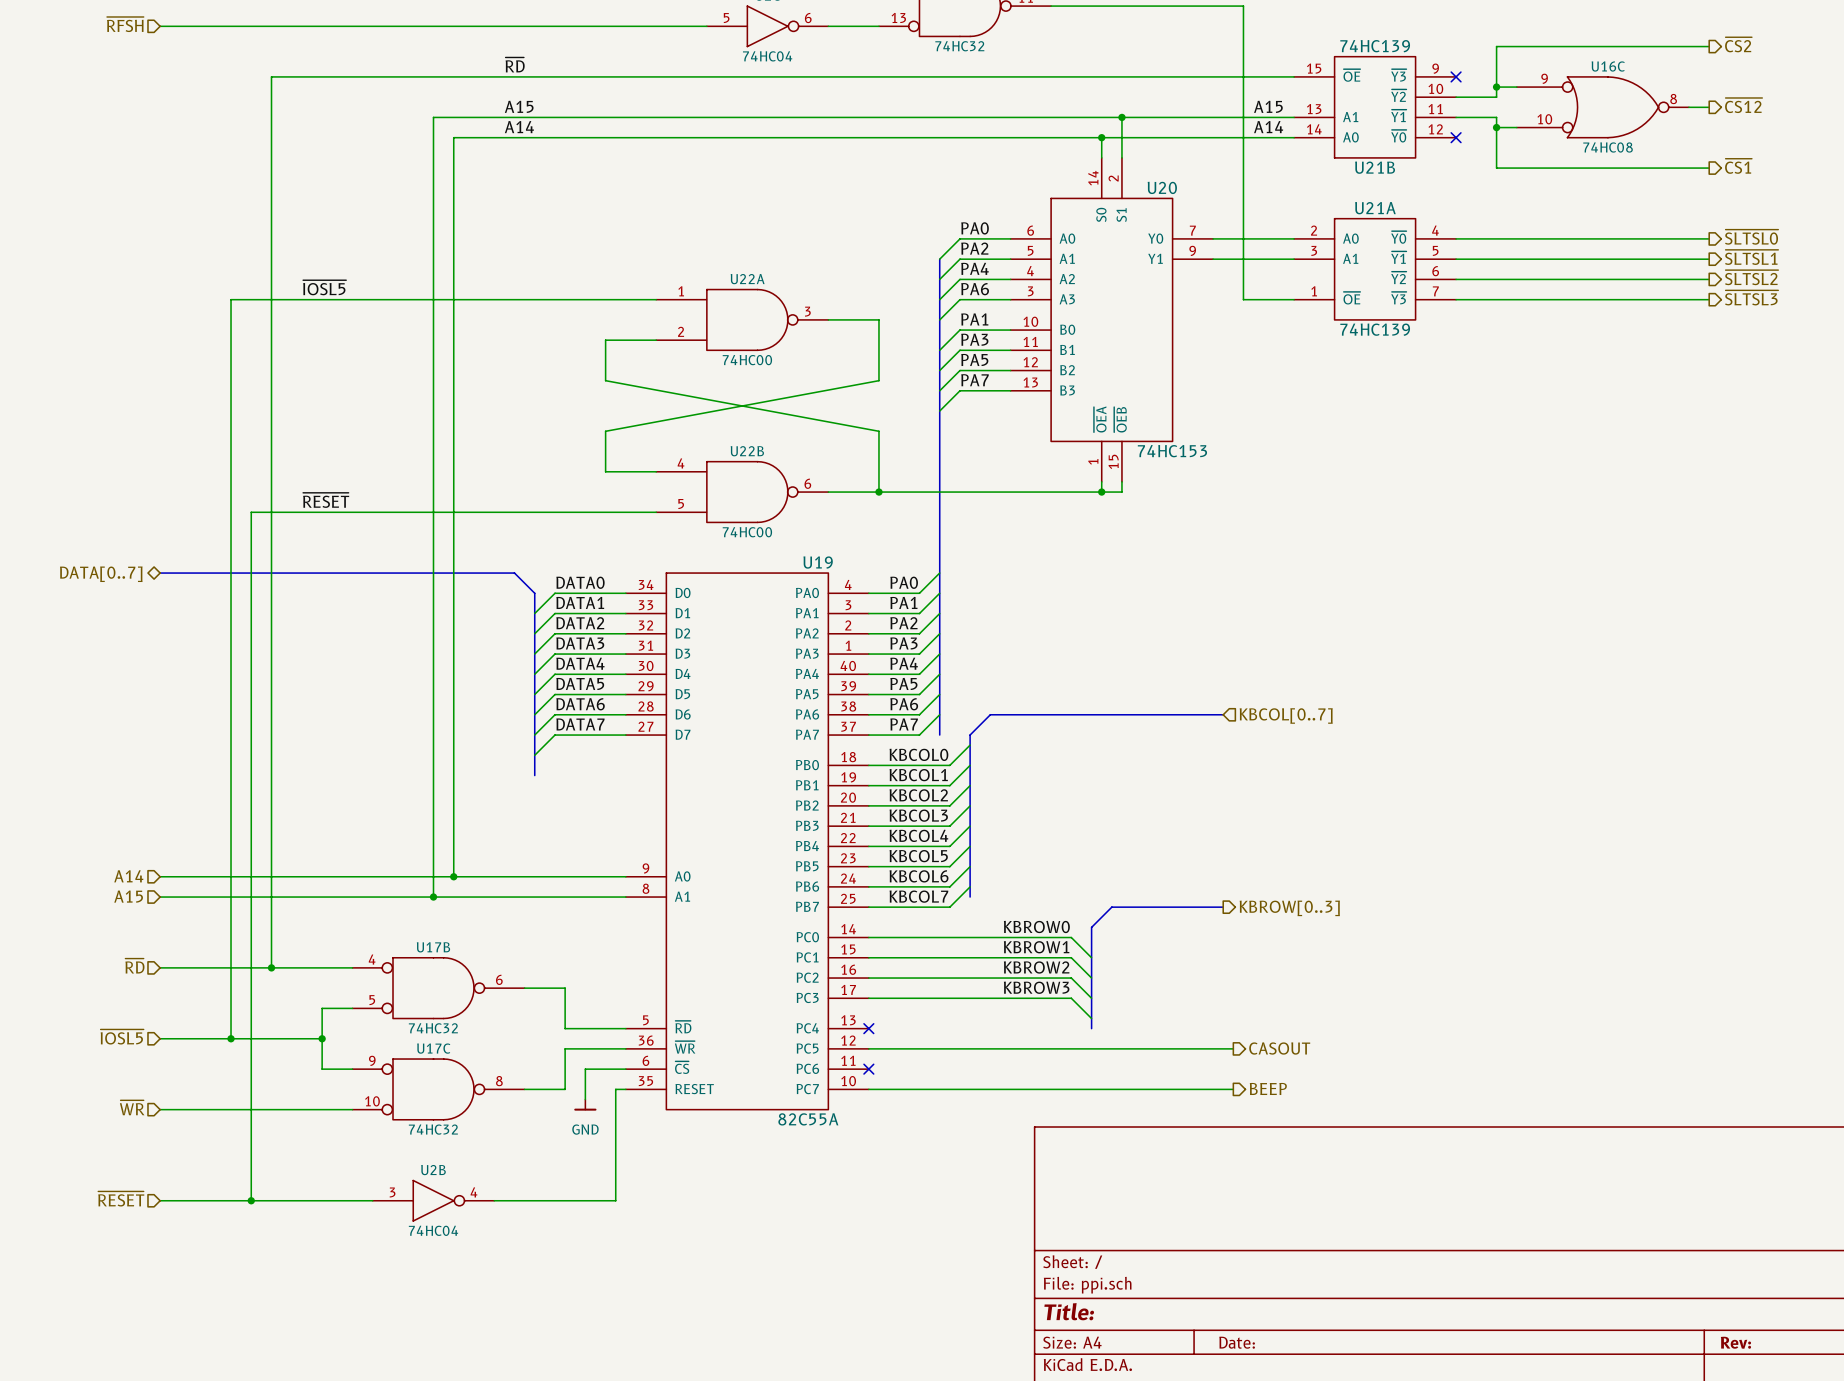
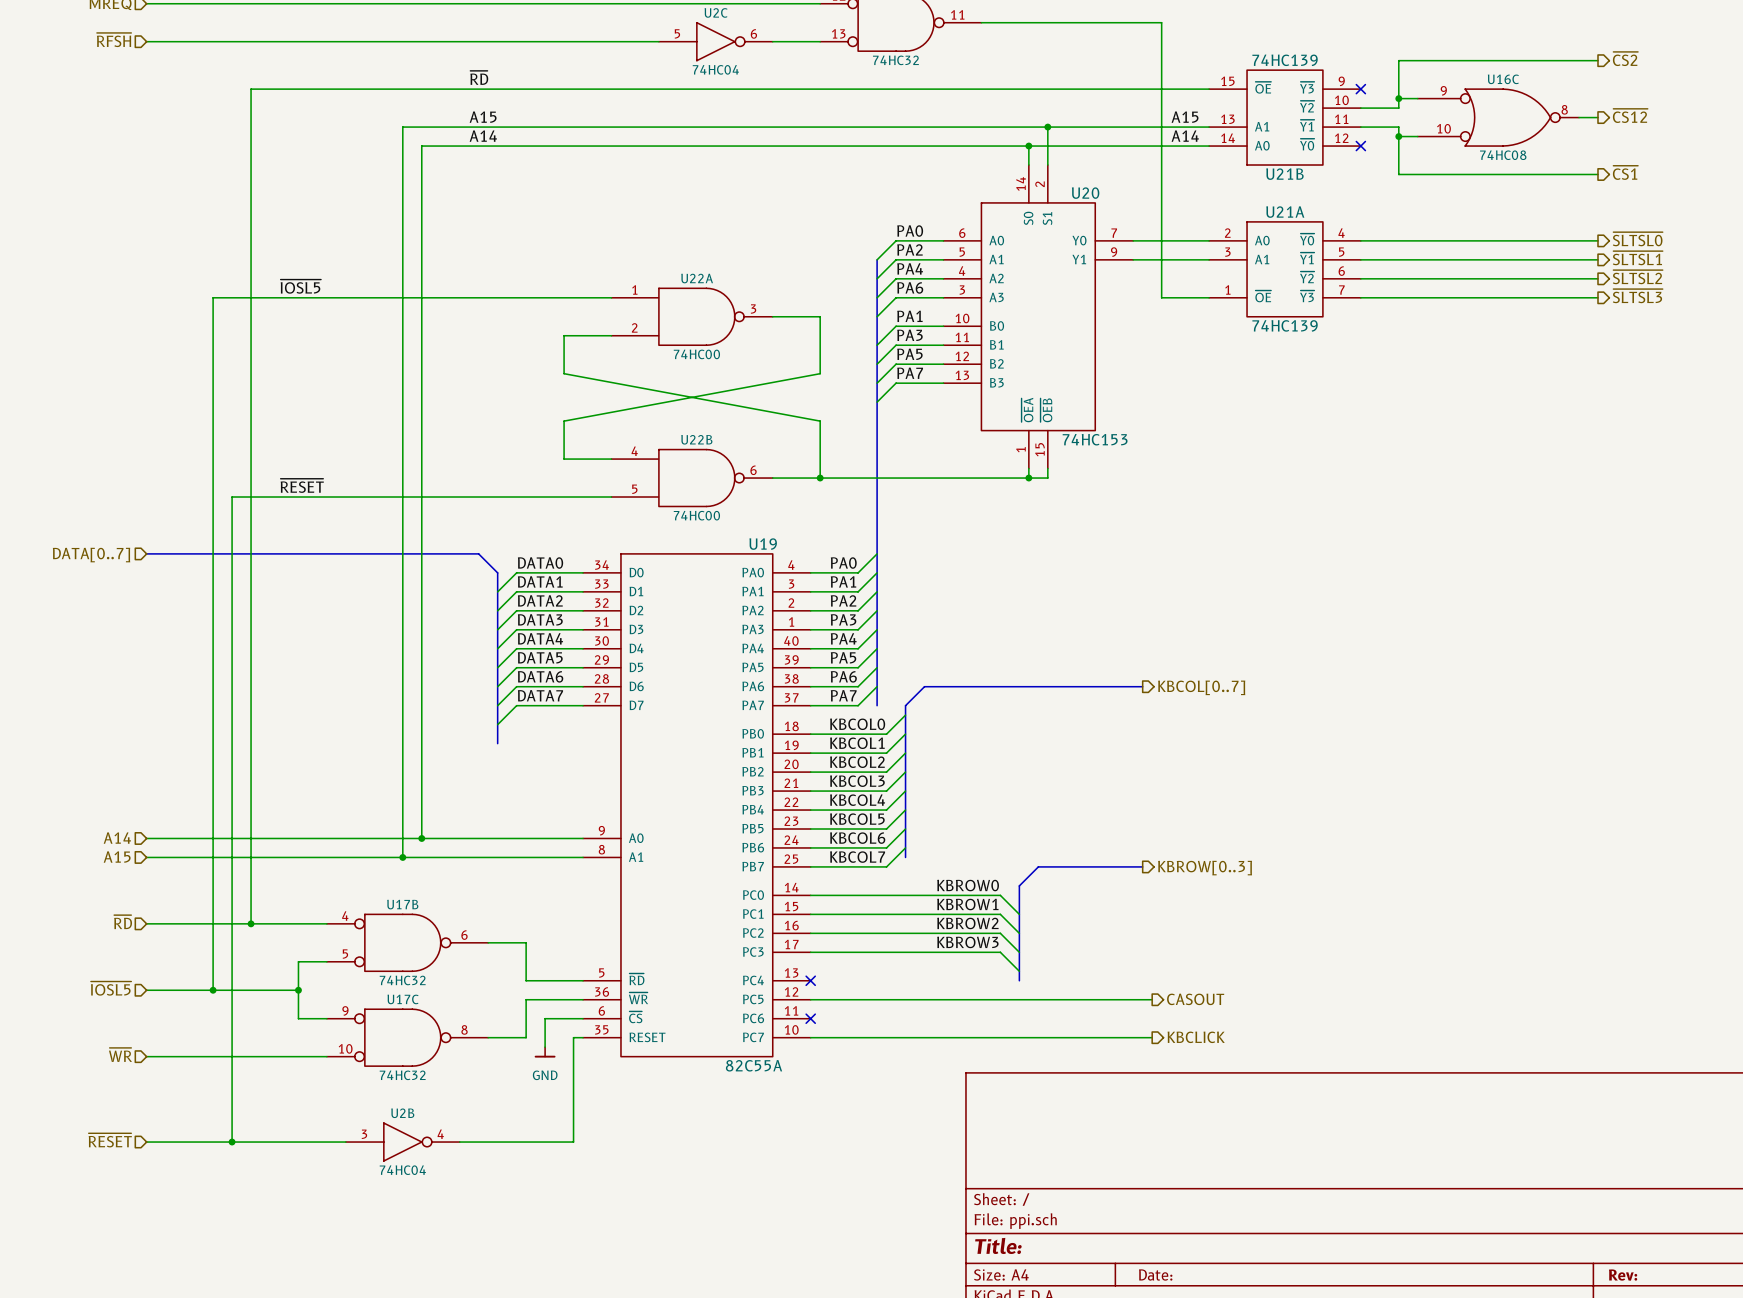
hierarchical label shape: bidirectional (101, 574) -> input (91, 555)
hierarchical label shape: input (1286, 716) -> output (1201, 687)
hierarchical label: BEEP (1268, 1088) -> KBCLICK (1196, 1037)

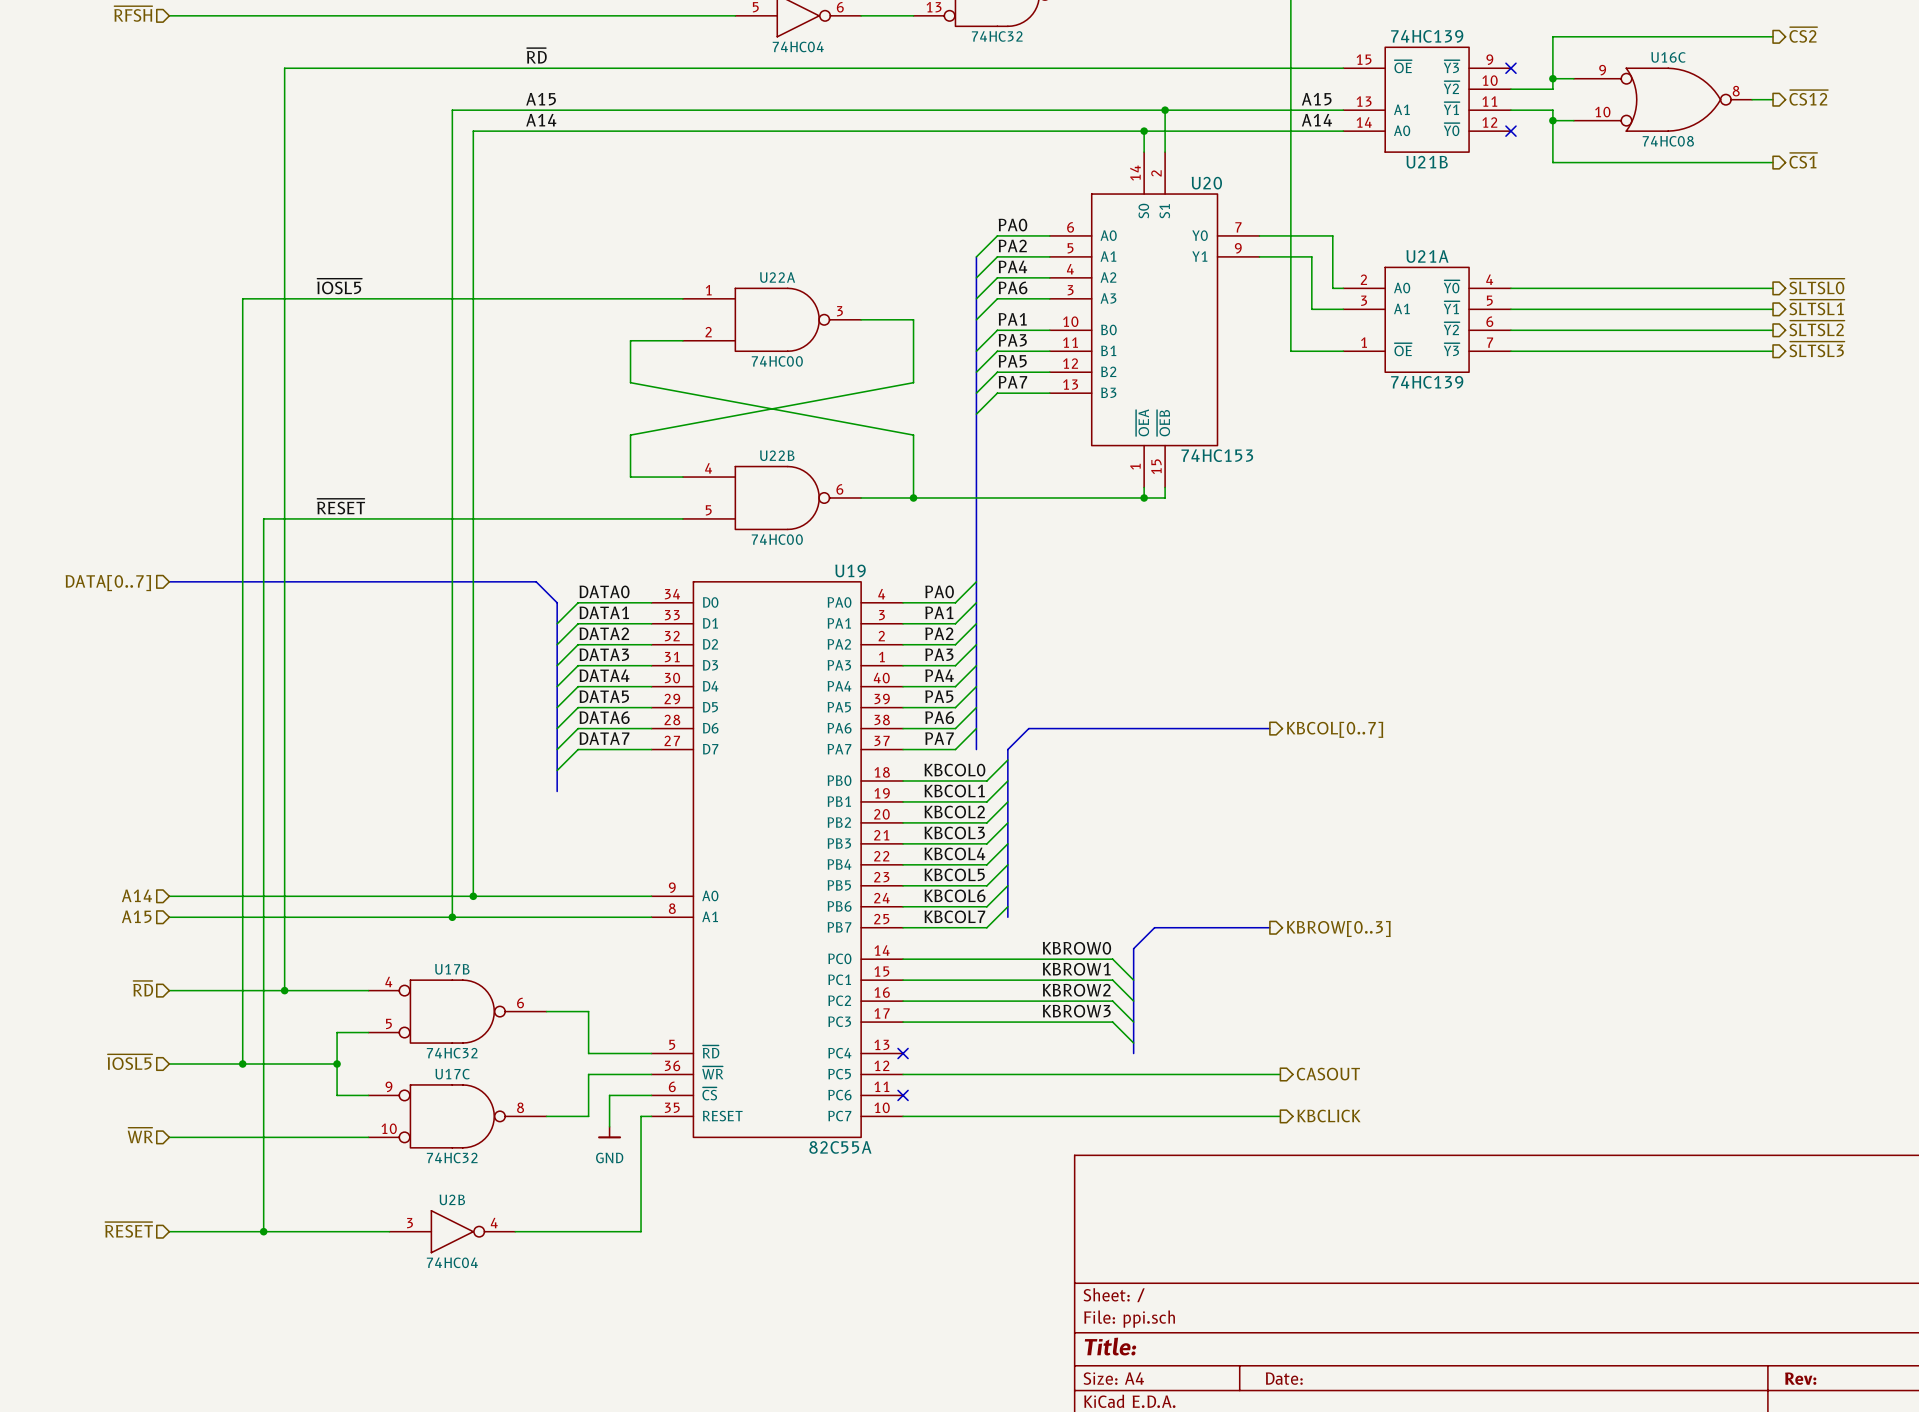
hierarchical label position: ~{SLTSL0} (1637, 239) -> ~{SLTSL0} (1817, 286)
wire: (1199, 240) (1209, 240) -> (1332, 235) (1332, 288) (1343, 288)
wire: (1360, 240) (1597, 240) -> (1510, 288) (1773, 288)
hierarchical label position: ~{SLTSL1} (1637, 258) -> ~{SLTSL1} (1817, 307)
wire: (1180, 259) (1209, 259) -> (1311, 256) (1311, 309) (1343, 309)
wire: (1360, 259) (1597, 259) -> (1510, 309) (1773, 309)
U21A position: (1284, 269) -> (1427, 319)
hierarchical label position: ~{SLTSL2} (1637, 277) -> ~{SLTSL2} (1817, 328)
wire: (1360, 278) (1597, 278) -> (1510, 330) (1773, 330)
hierarchical label position: ~{SLTSL3} (1637, 296) -> ~{SLTSL3} (1817, 349)
wire: (1161, 297) (1209, 297) -> (1290, 298) (1290, 351) (1343, 351)
wire: (1360, 297) (1597, 297) -> (1510, 351) (1773, 351)

